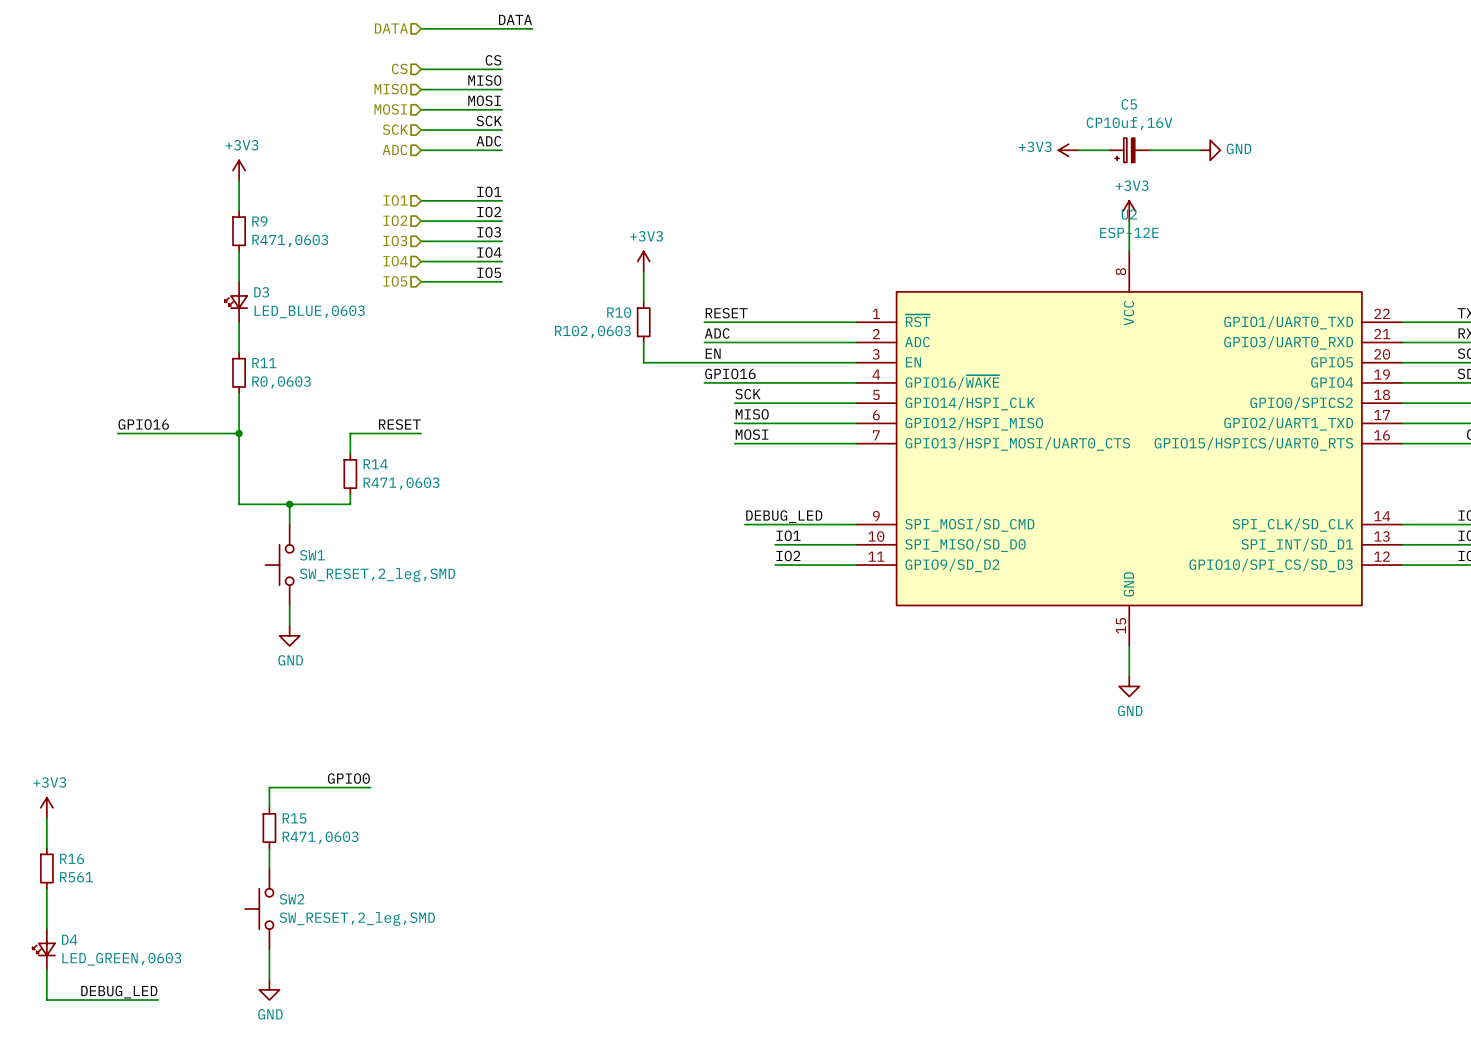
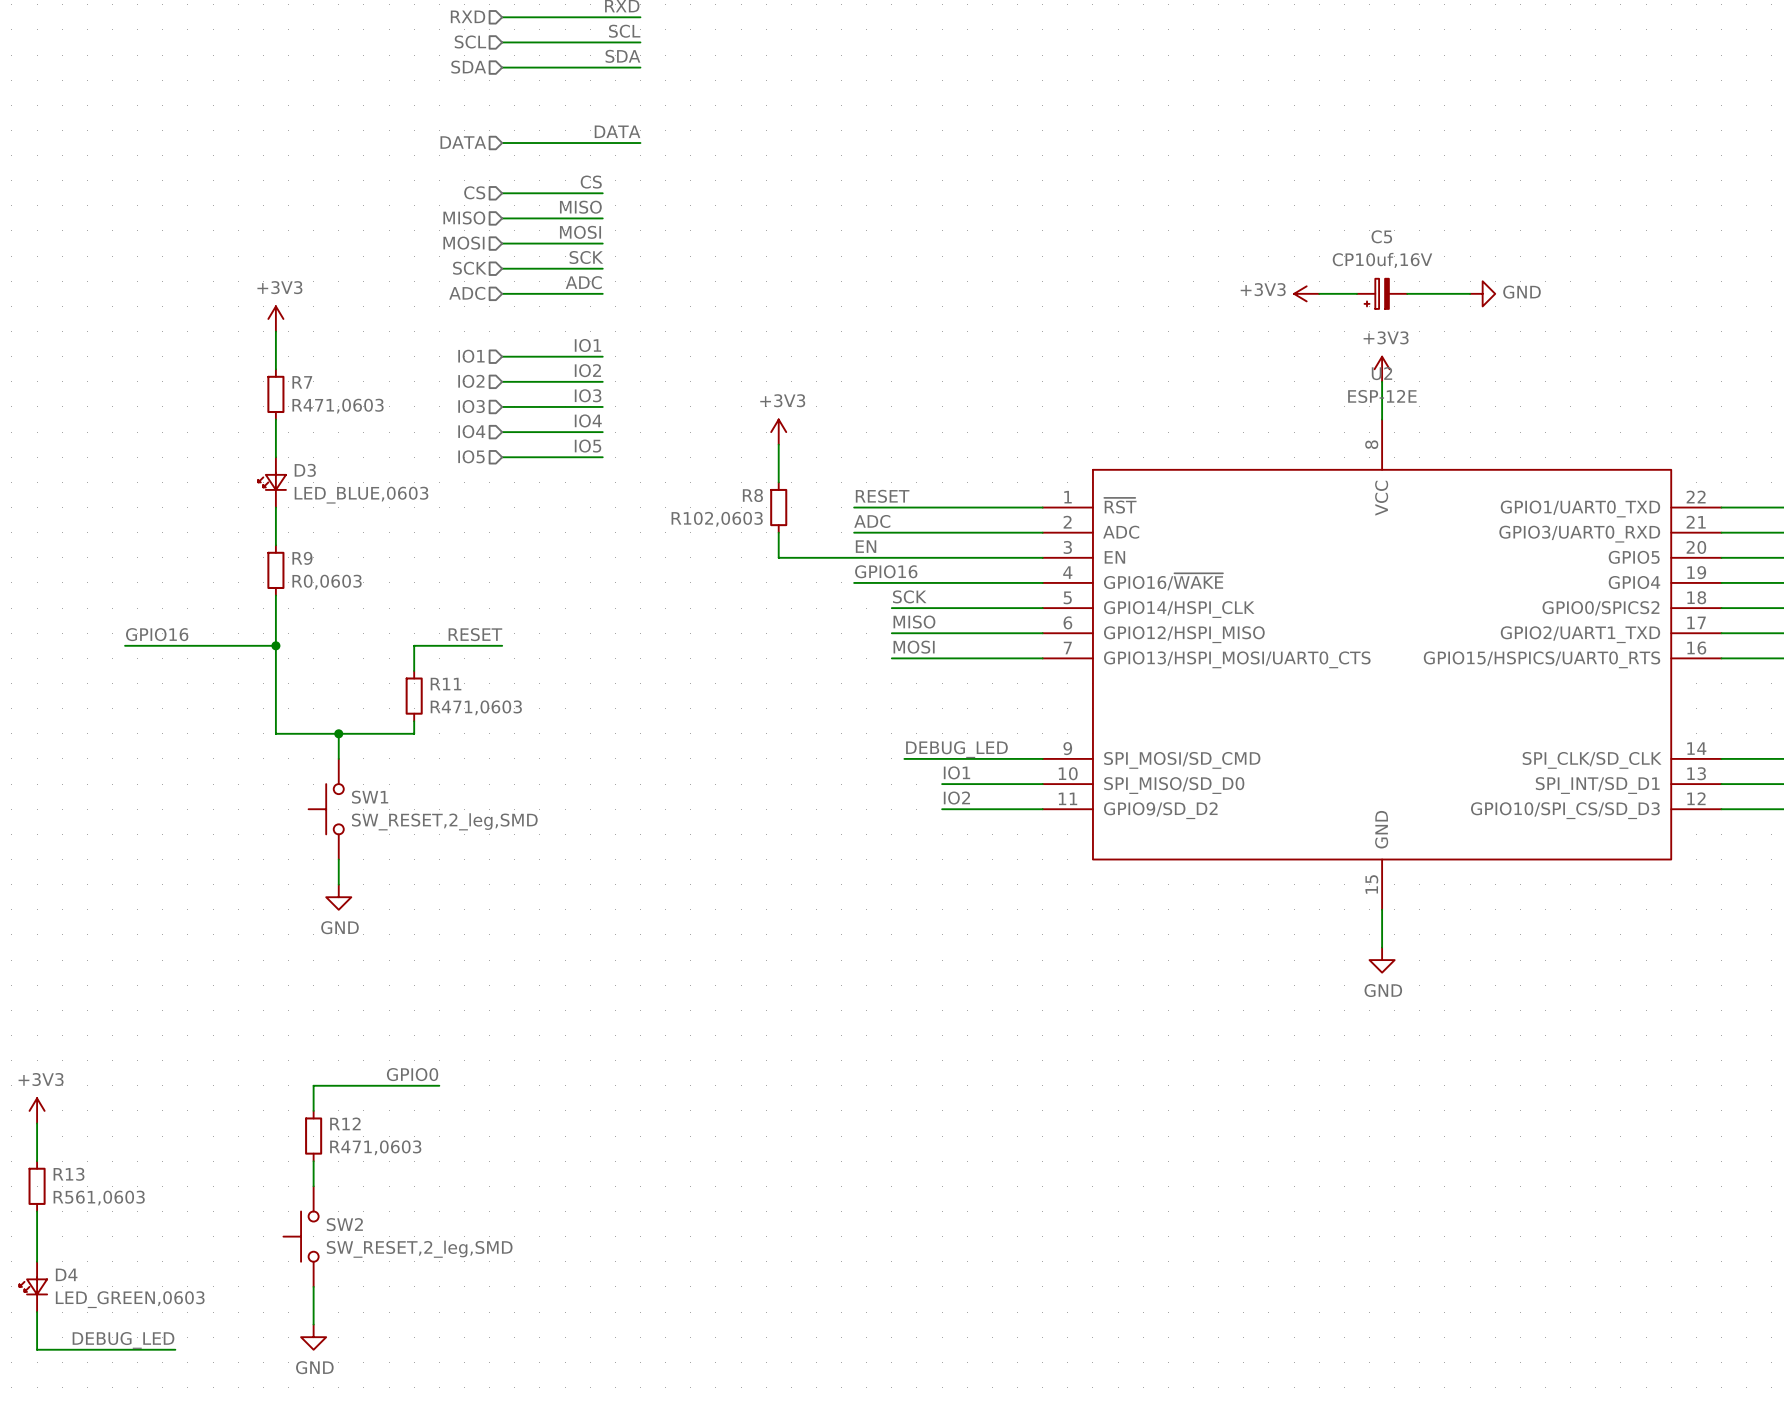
R9 name: R9 (259, 221) -> R7 (302, 382)
R10 name: R10 (619, 312) -> R8 (752, 495)
R11 name: R11 (264, 363) -> R9 (302, 558)
R14 name: R14 (375, 464) -> R11 (446, 684)
R15 name: R15 (294, 818) -> R12 (345, 1123)
R16 name: R16 (72, 858) -> R13 (69, 1174)
R16 value: R561 (76, 877) -> R561,0603 (99, 1198)

